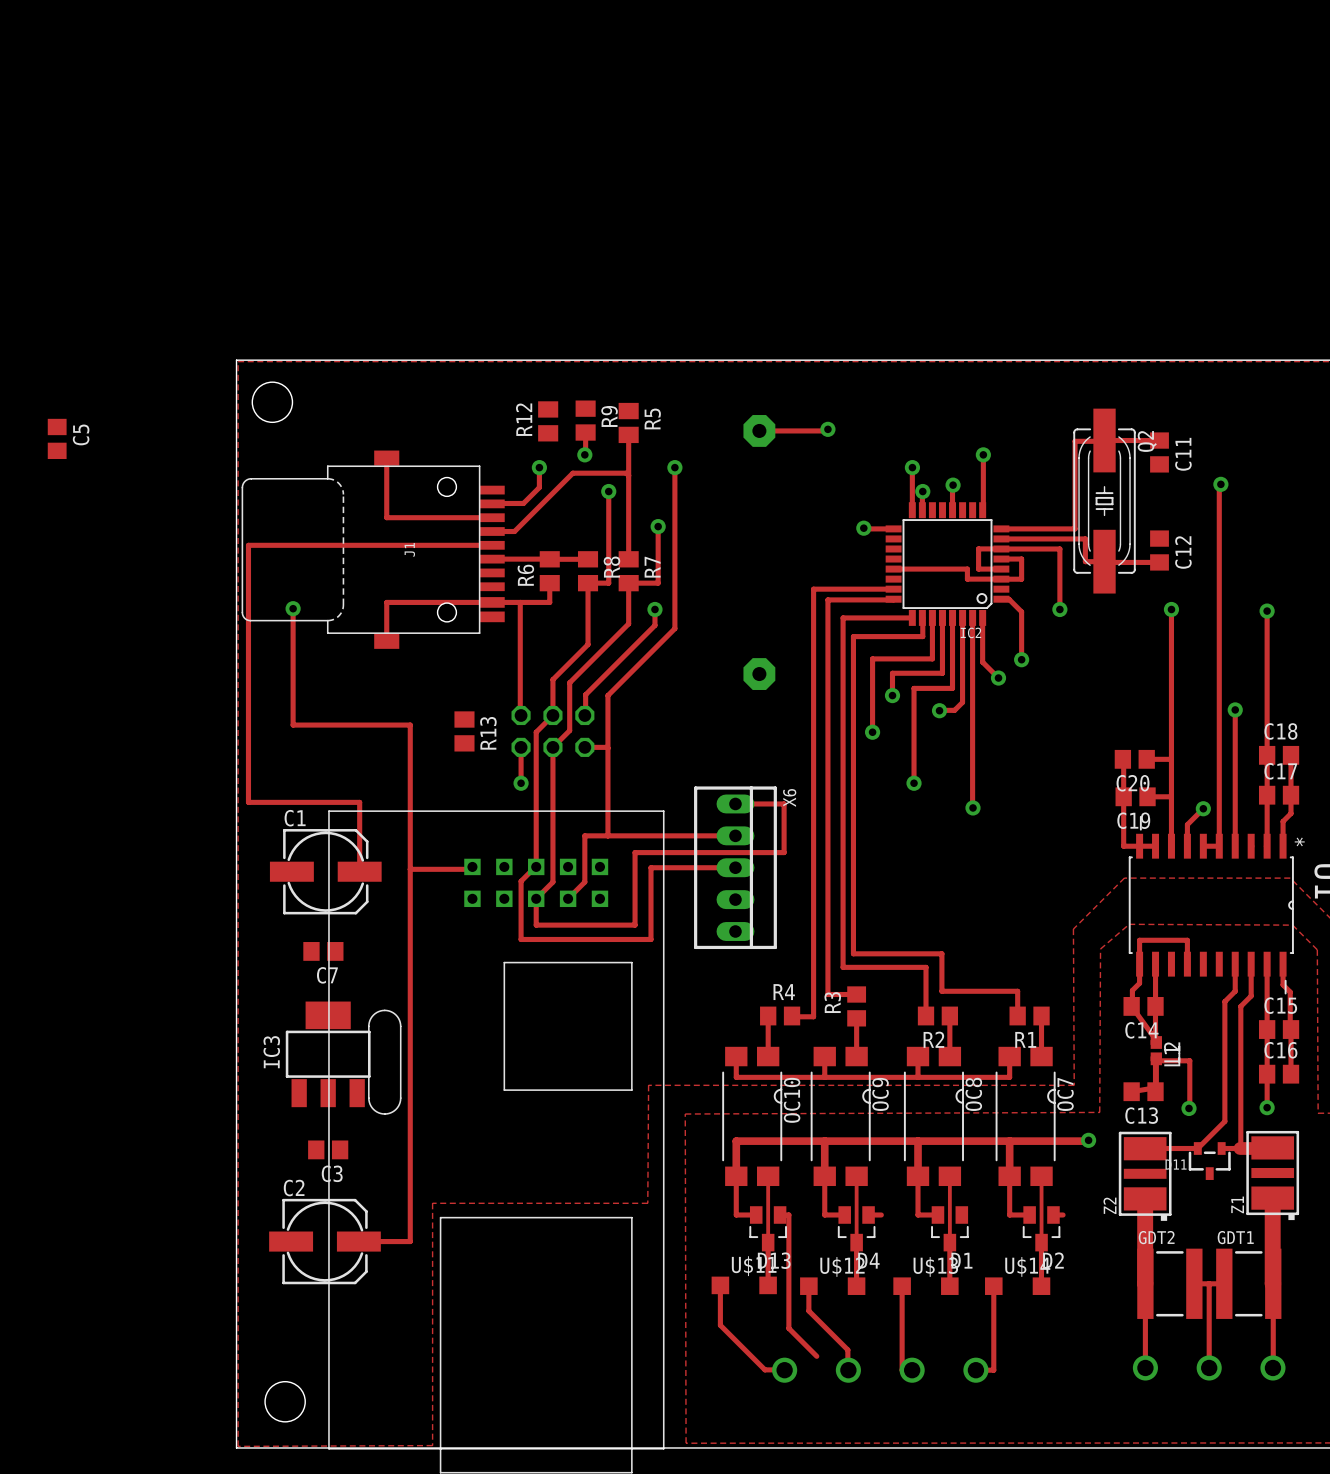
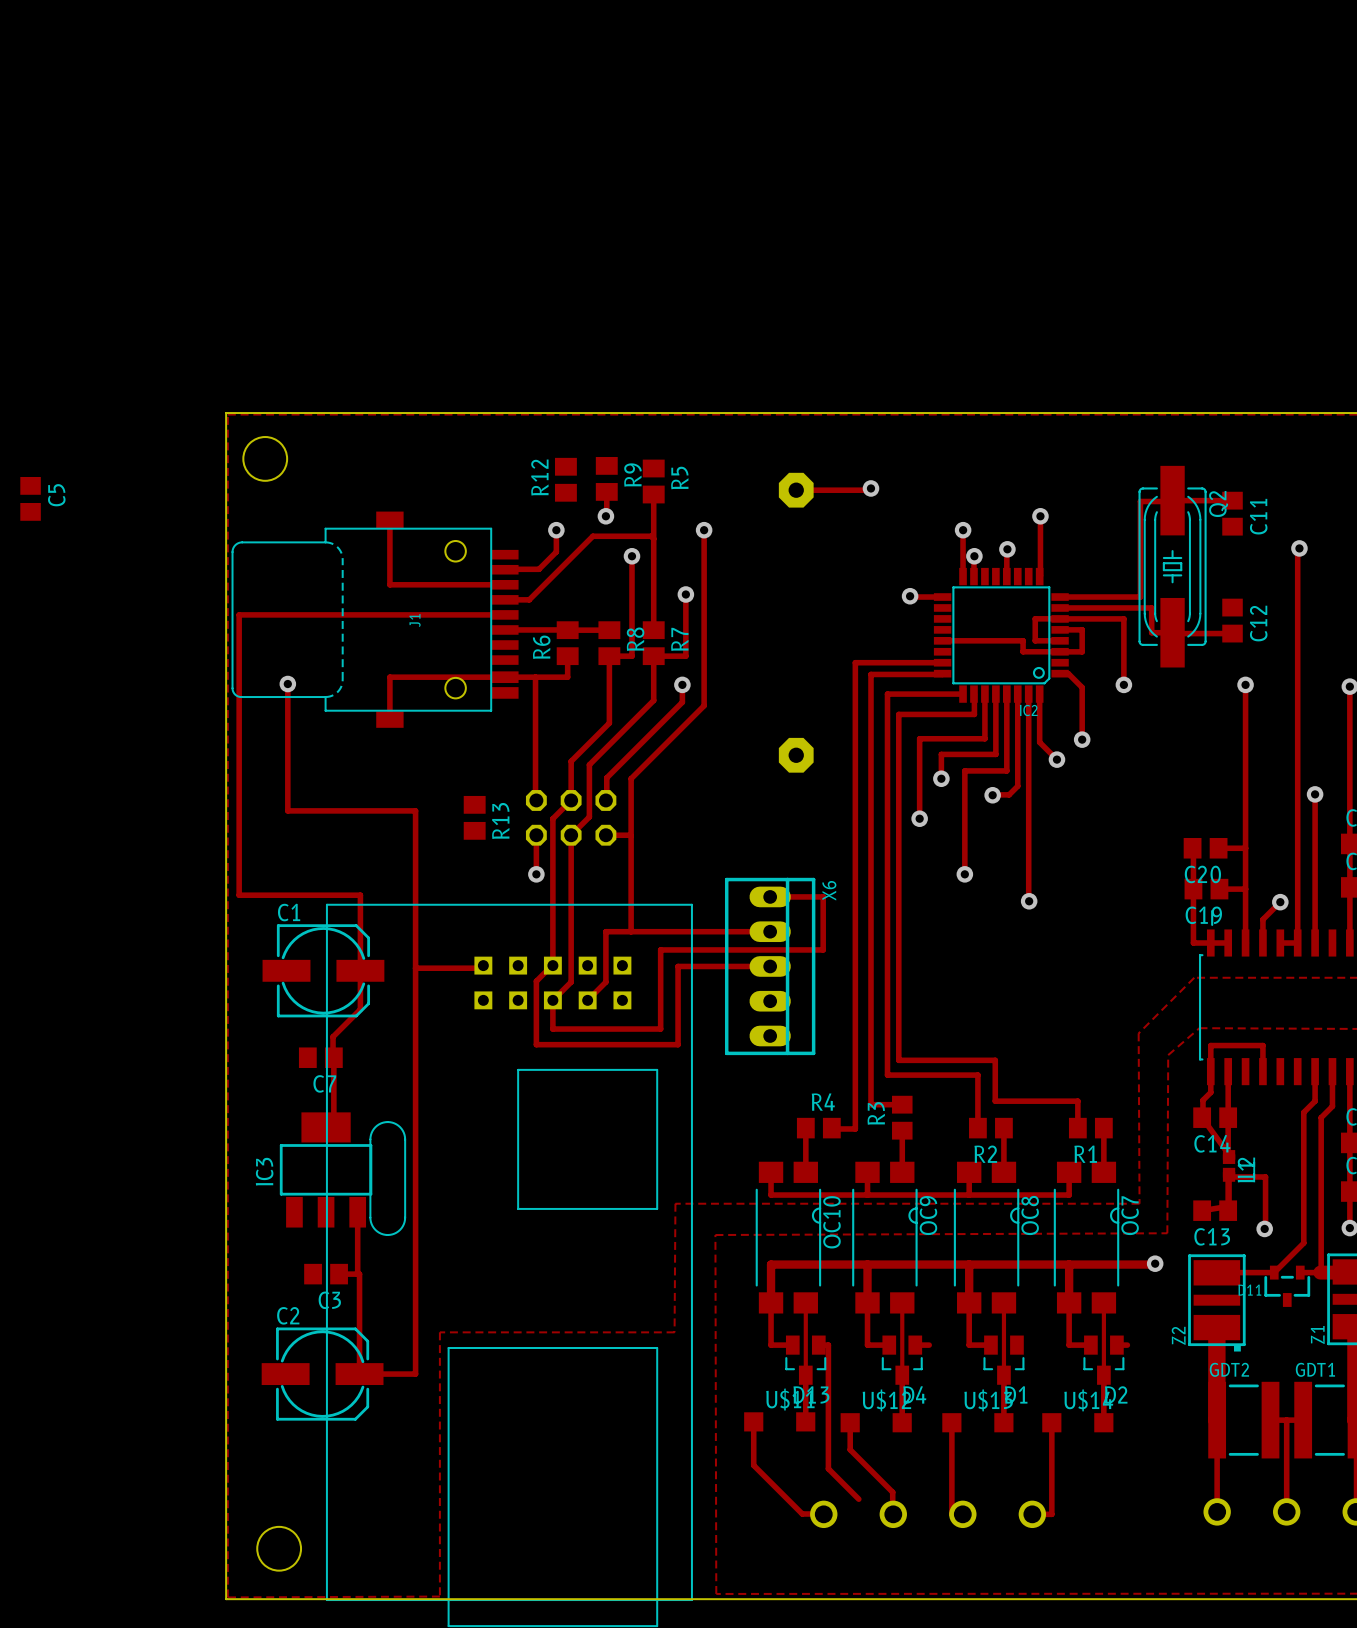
track: none -> (360, 970) (360, 1009) (333, 1036) (333, 1119) (326, 1127)
track: none -> (357, 1212) (357, 1274)
track: none -> (339, 1274) (359, 1274) (359, 1374)

